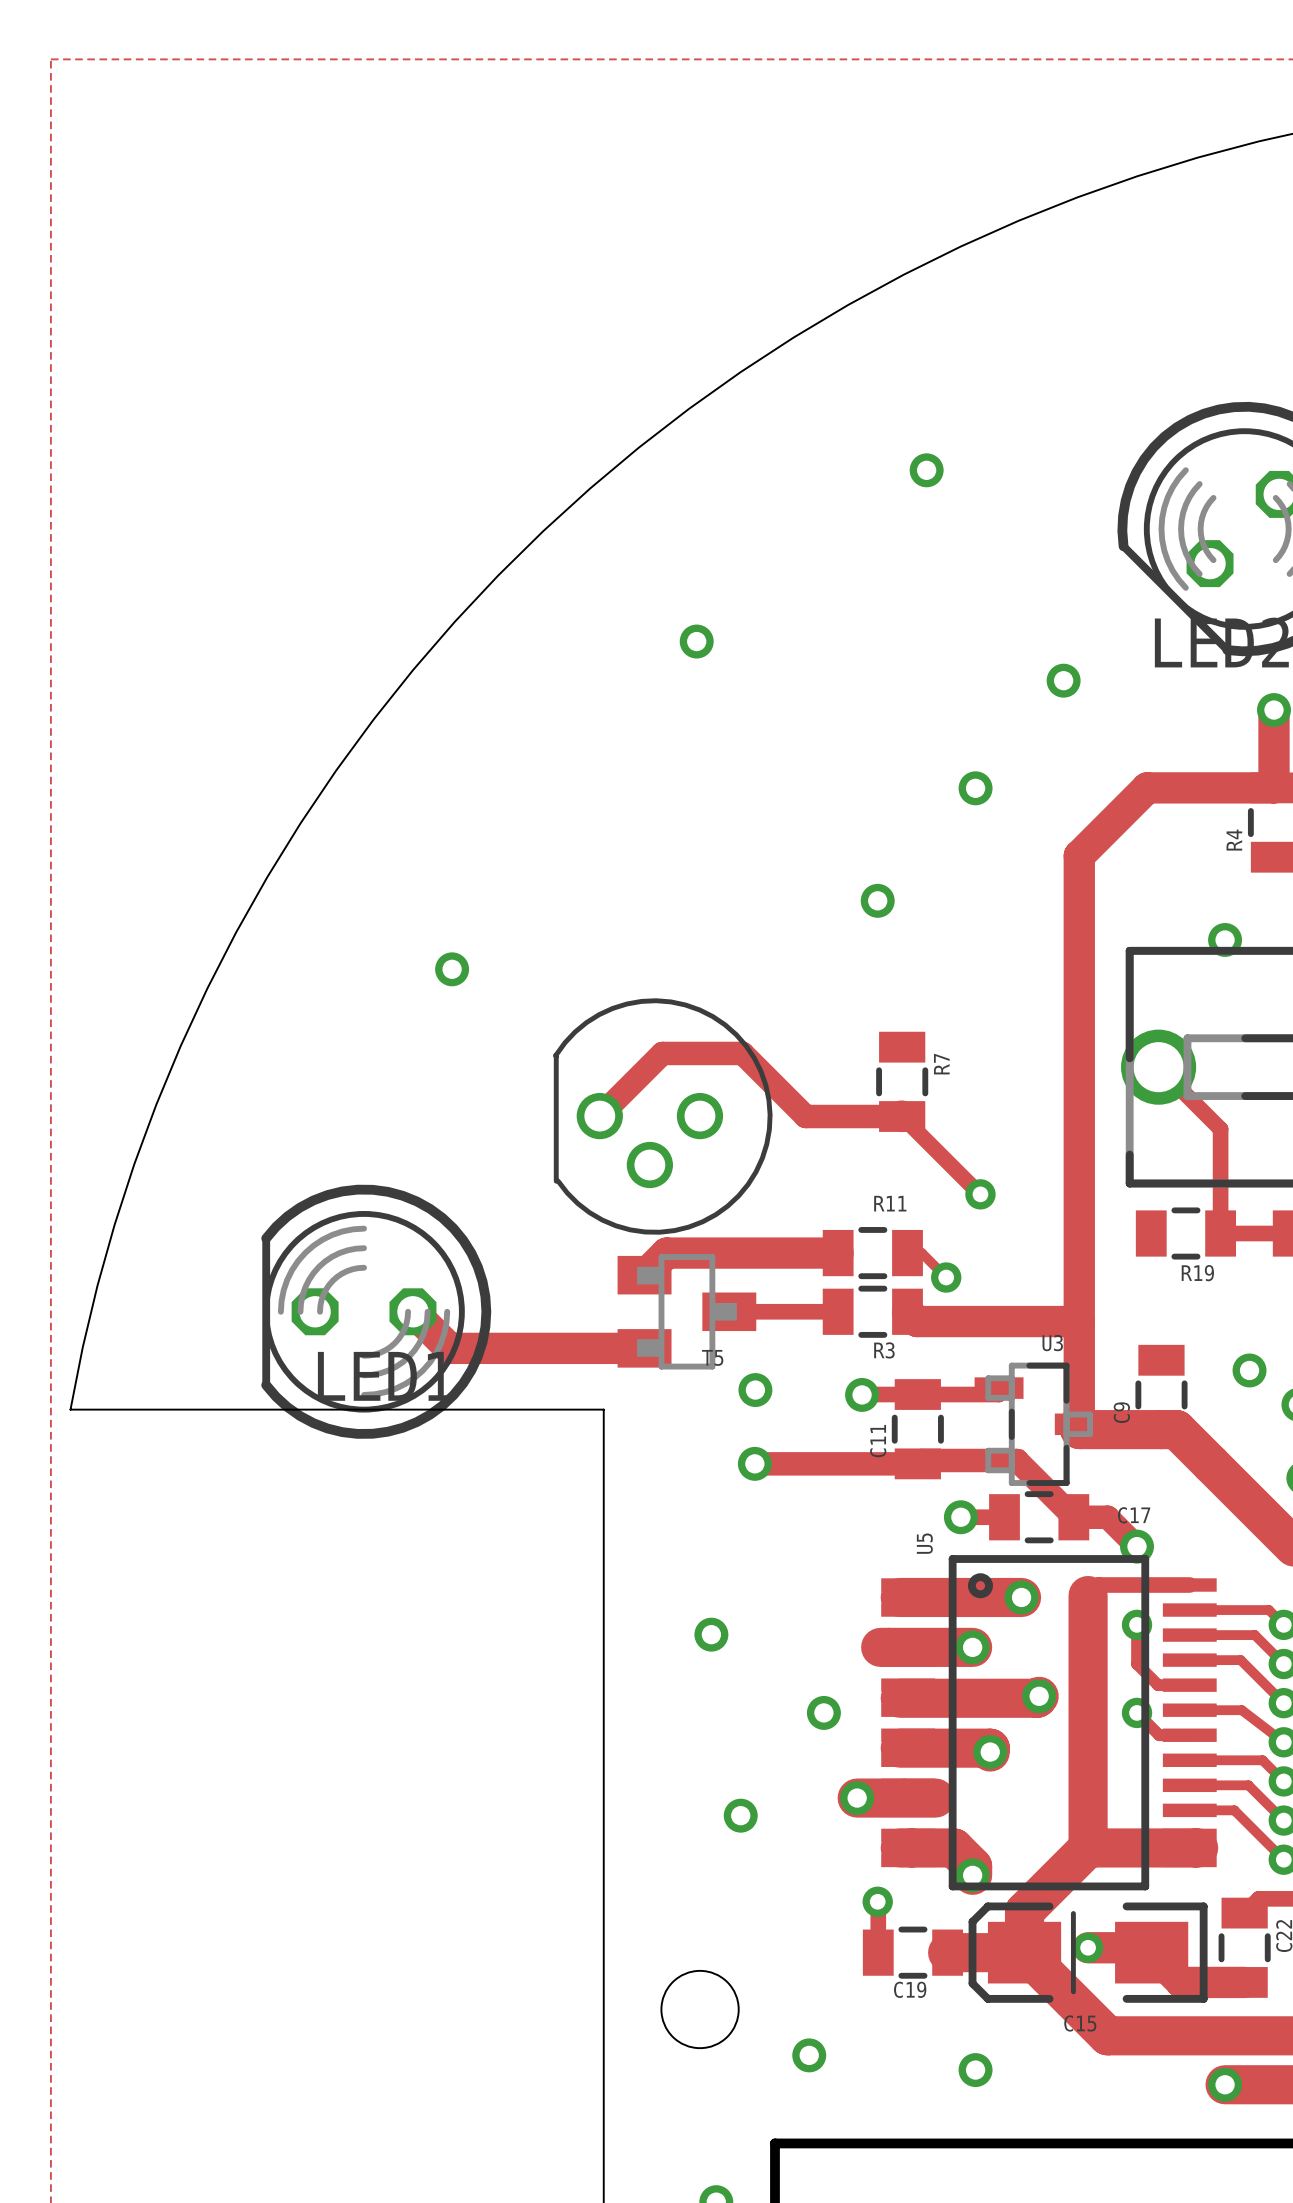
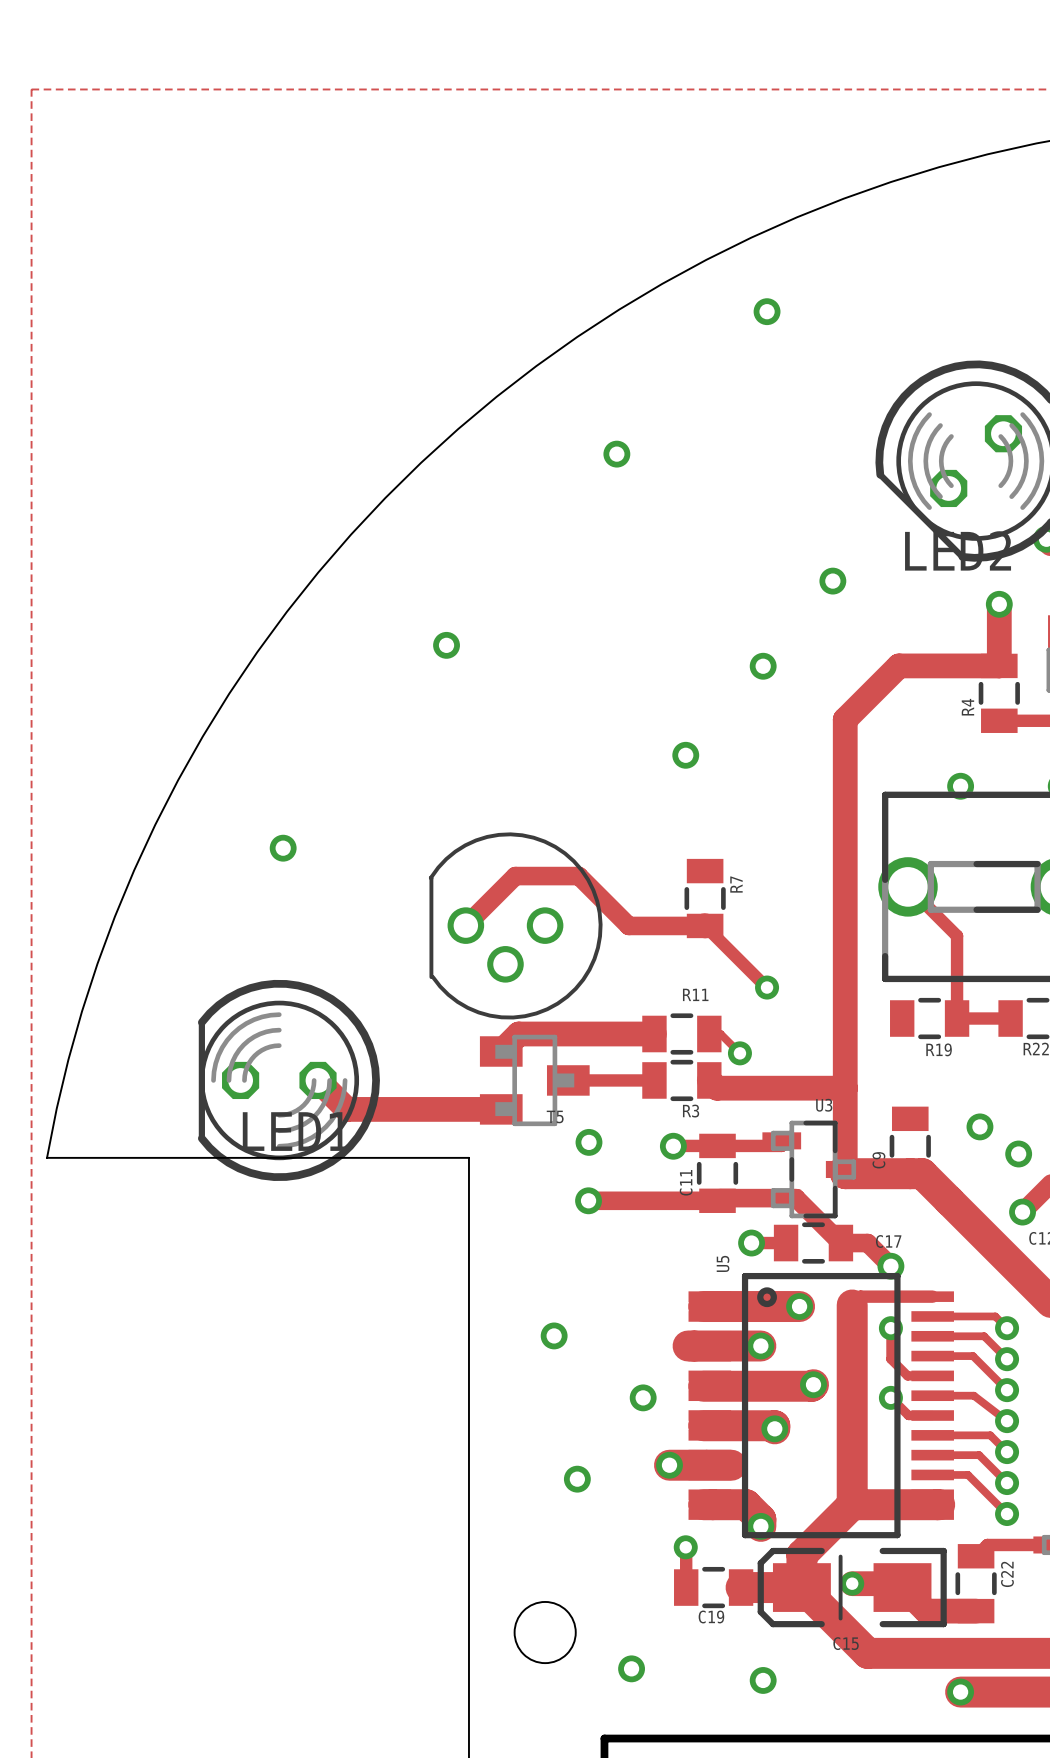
via: none -> (767, 311)
via: (926, 470) -> none
via: none -> (616, 454)
via: (696, 641) -> none
via: none -> (446, 645)
via position: (452, 969) -> (283, 848)

